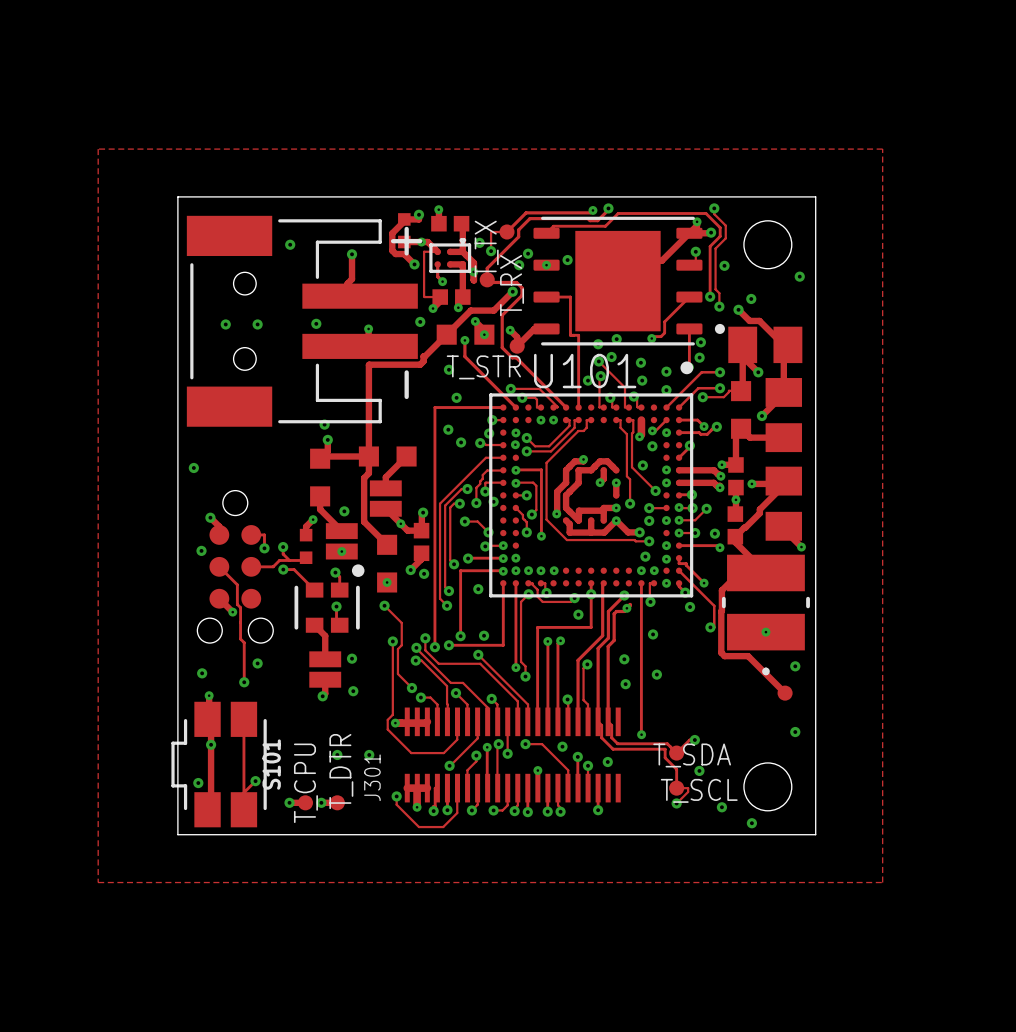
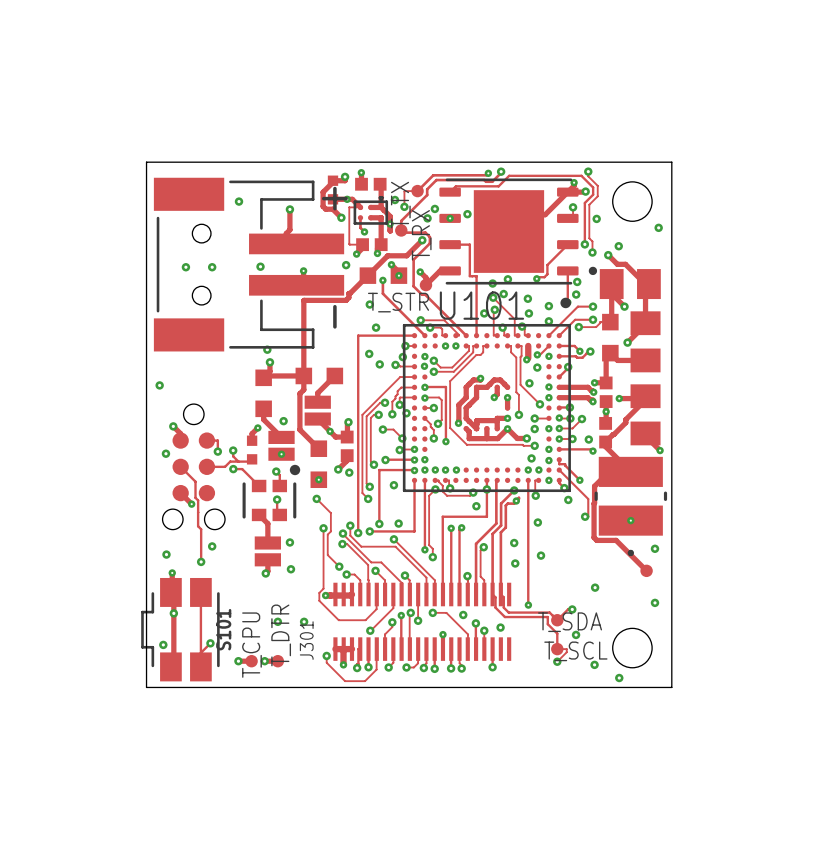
zone outline: (98, 149) (98, 882) (882, 882) (882, 149) (98, 149) -> none
via: none -> (595, 587)

